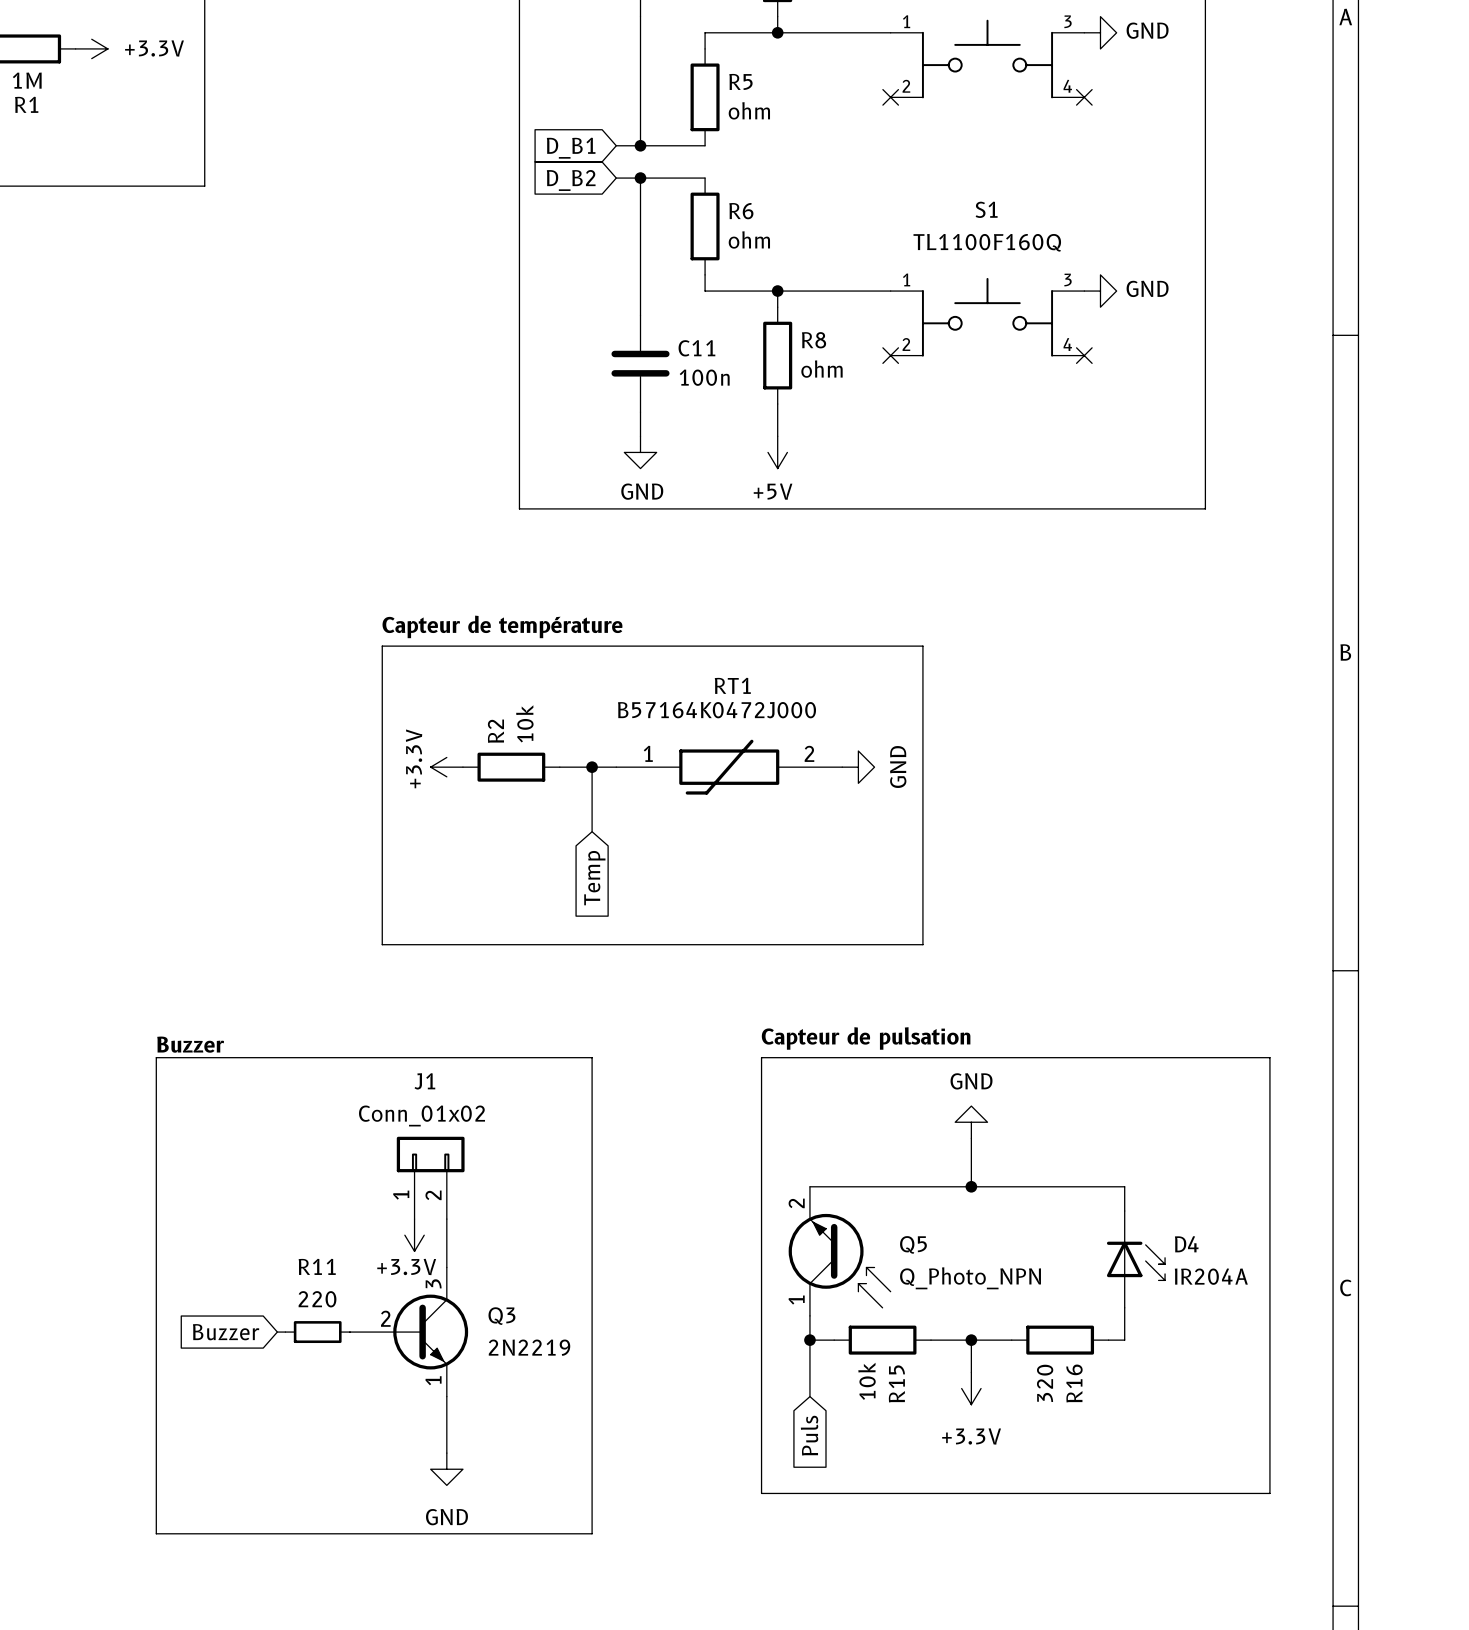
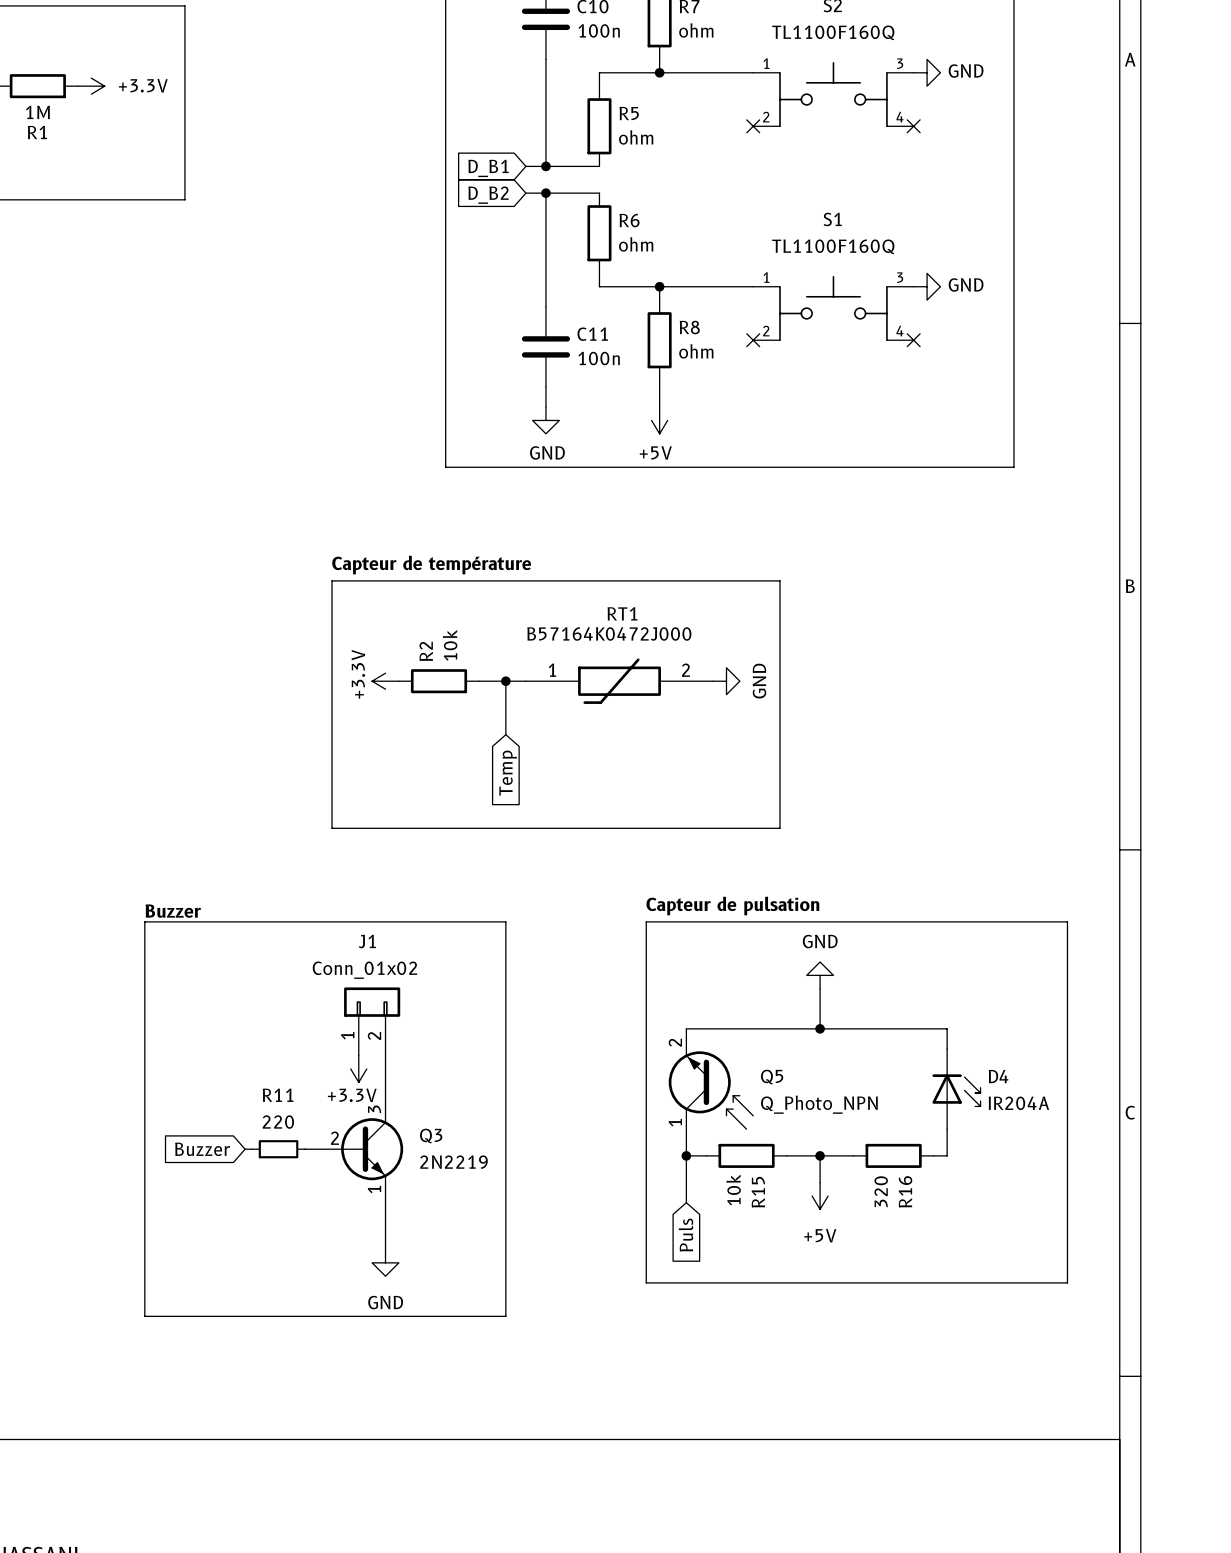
power symbol: +3.3V (971, 1388) -> +5V (820, 1196)

